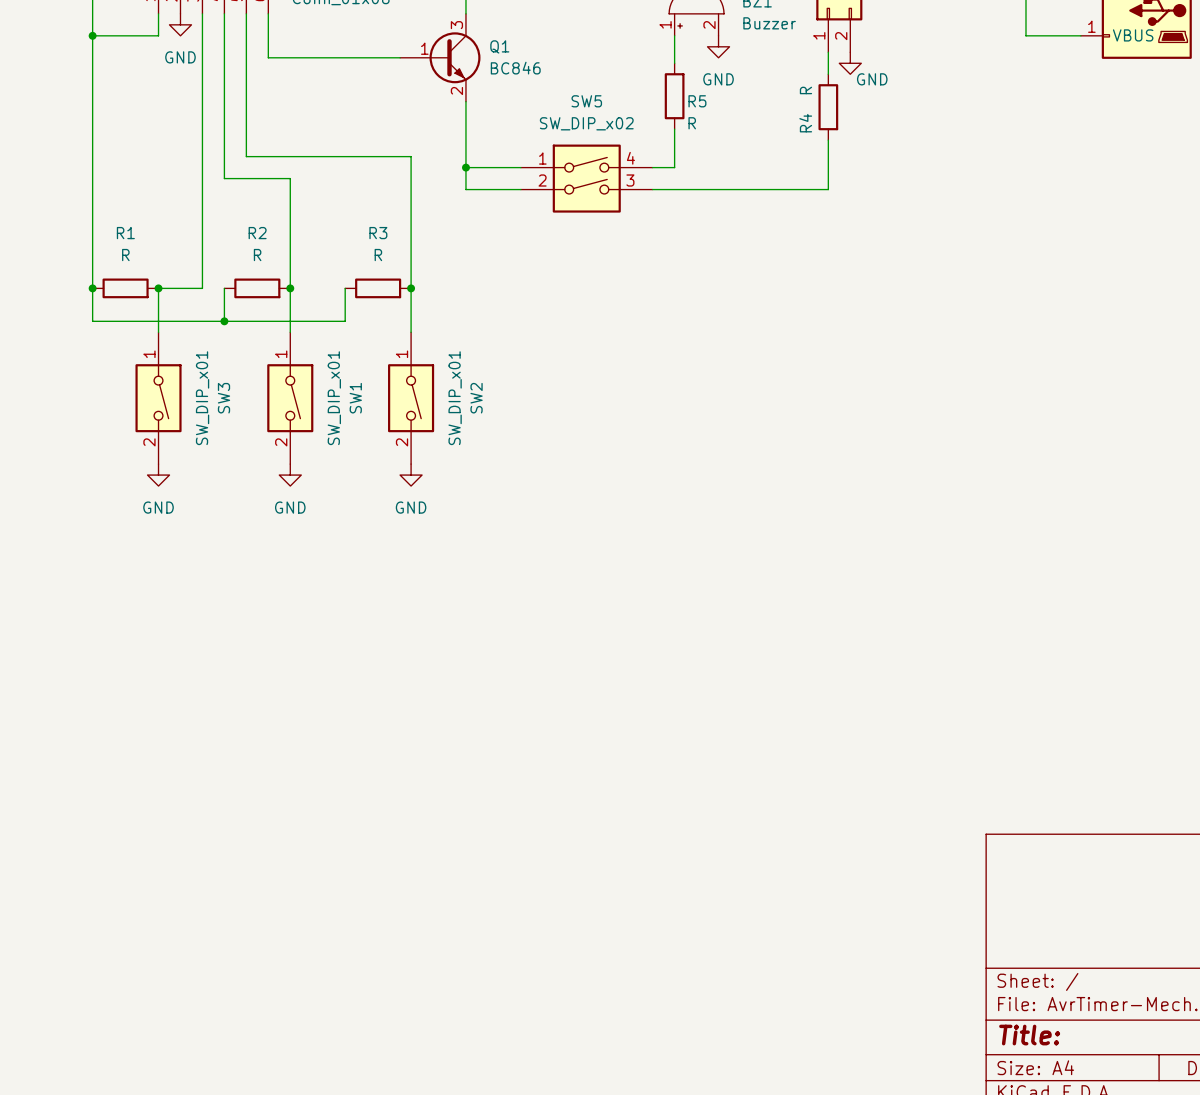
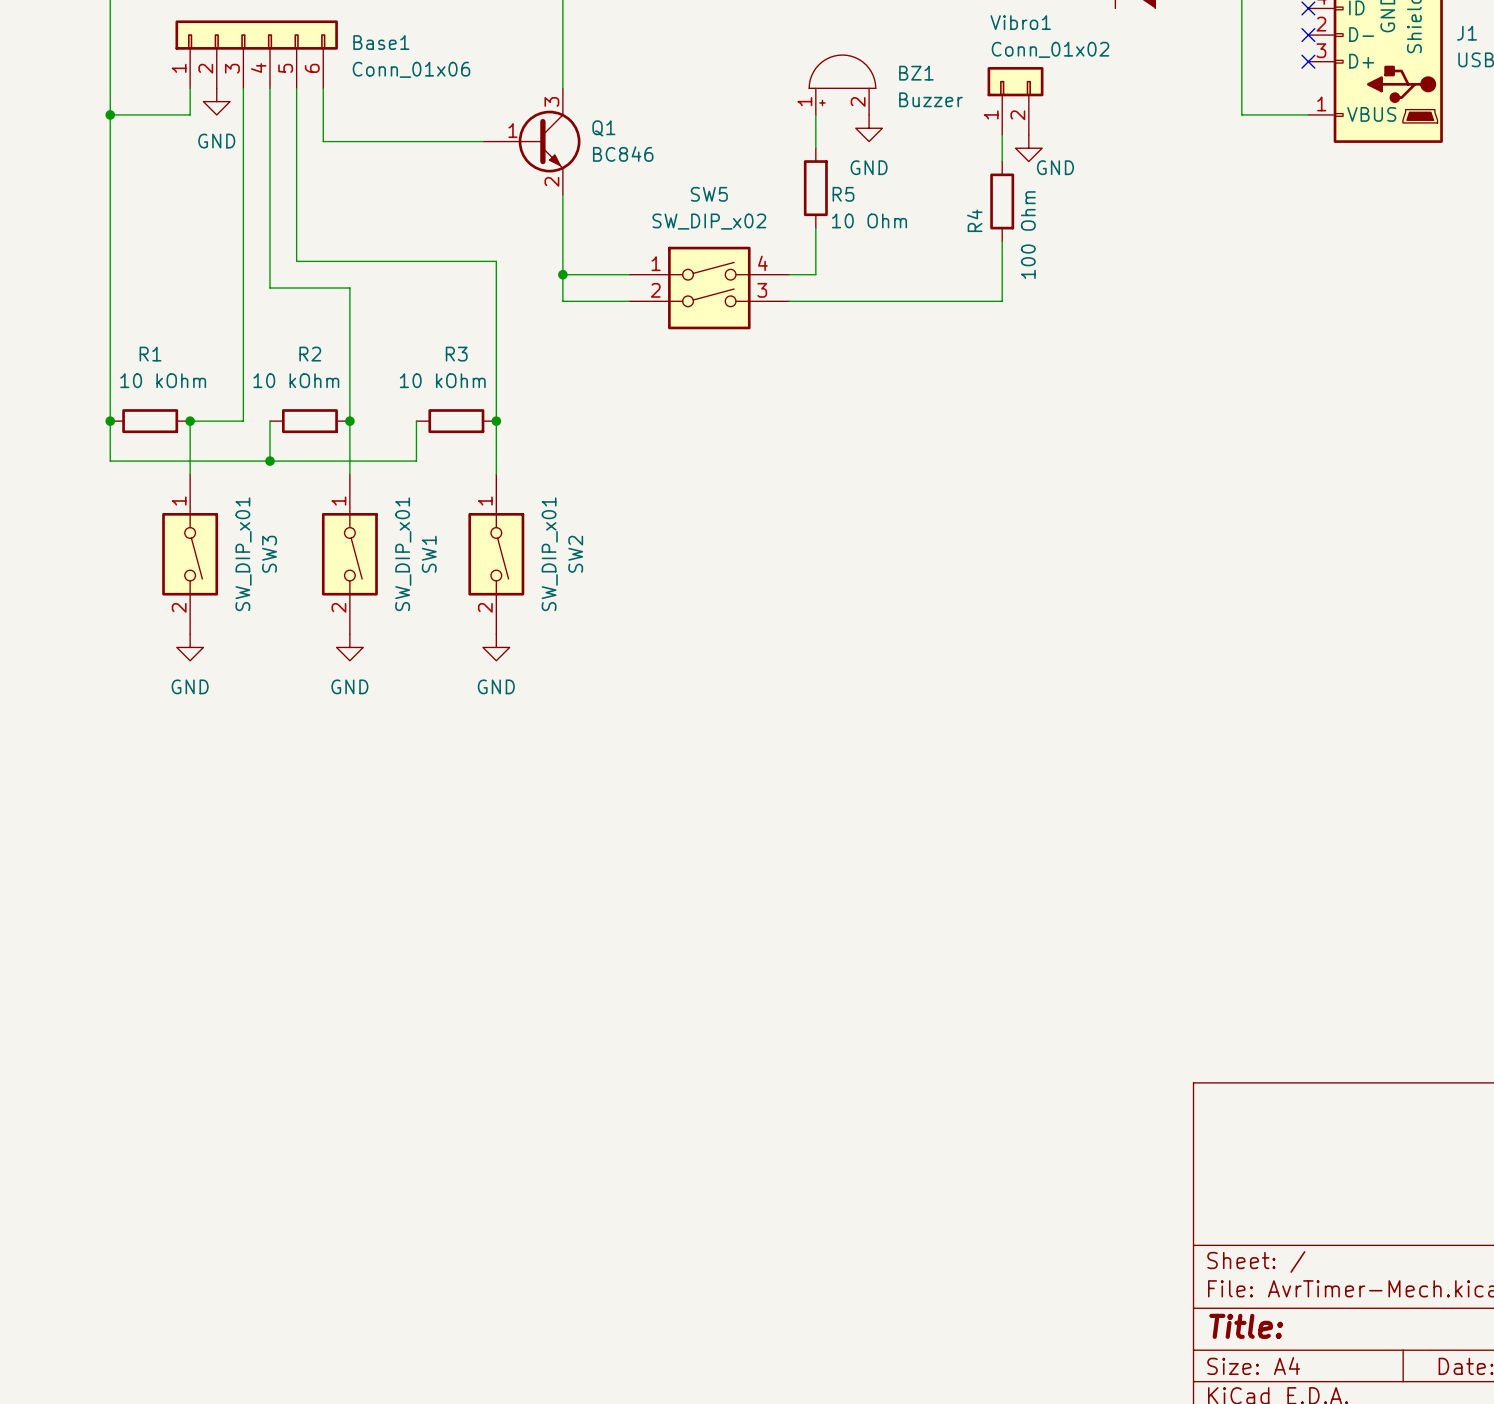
R4 value: R (805, 90) -> 100 Ohm (1028, 235)
R5 value: R (692, 123) -> 10 Ohm (869, 220)
R1 value: R (125, 255) -> 10 kOhm (163, 380)
R2 value: R (257, 255) -> 10 kOhm (296, 380)
R3 value: R (378, 255) -> 10 kOhm (442, 380)

